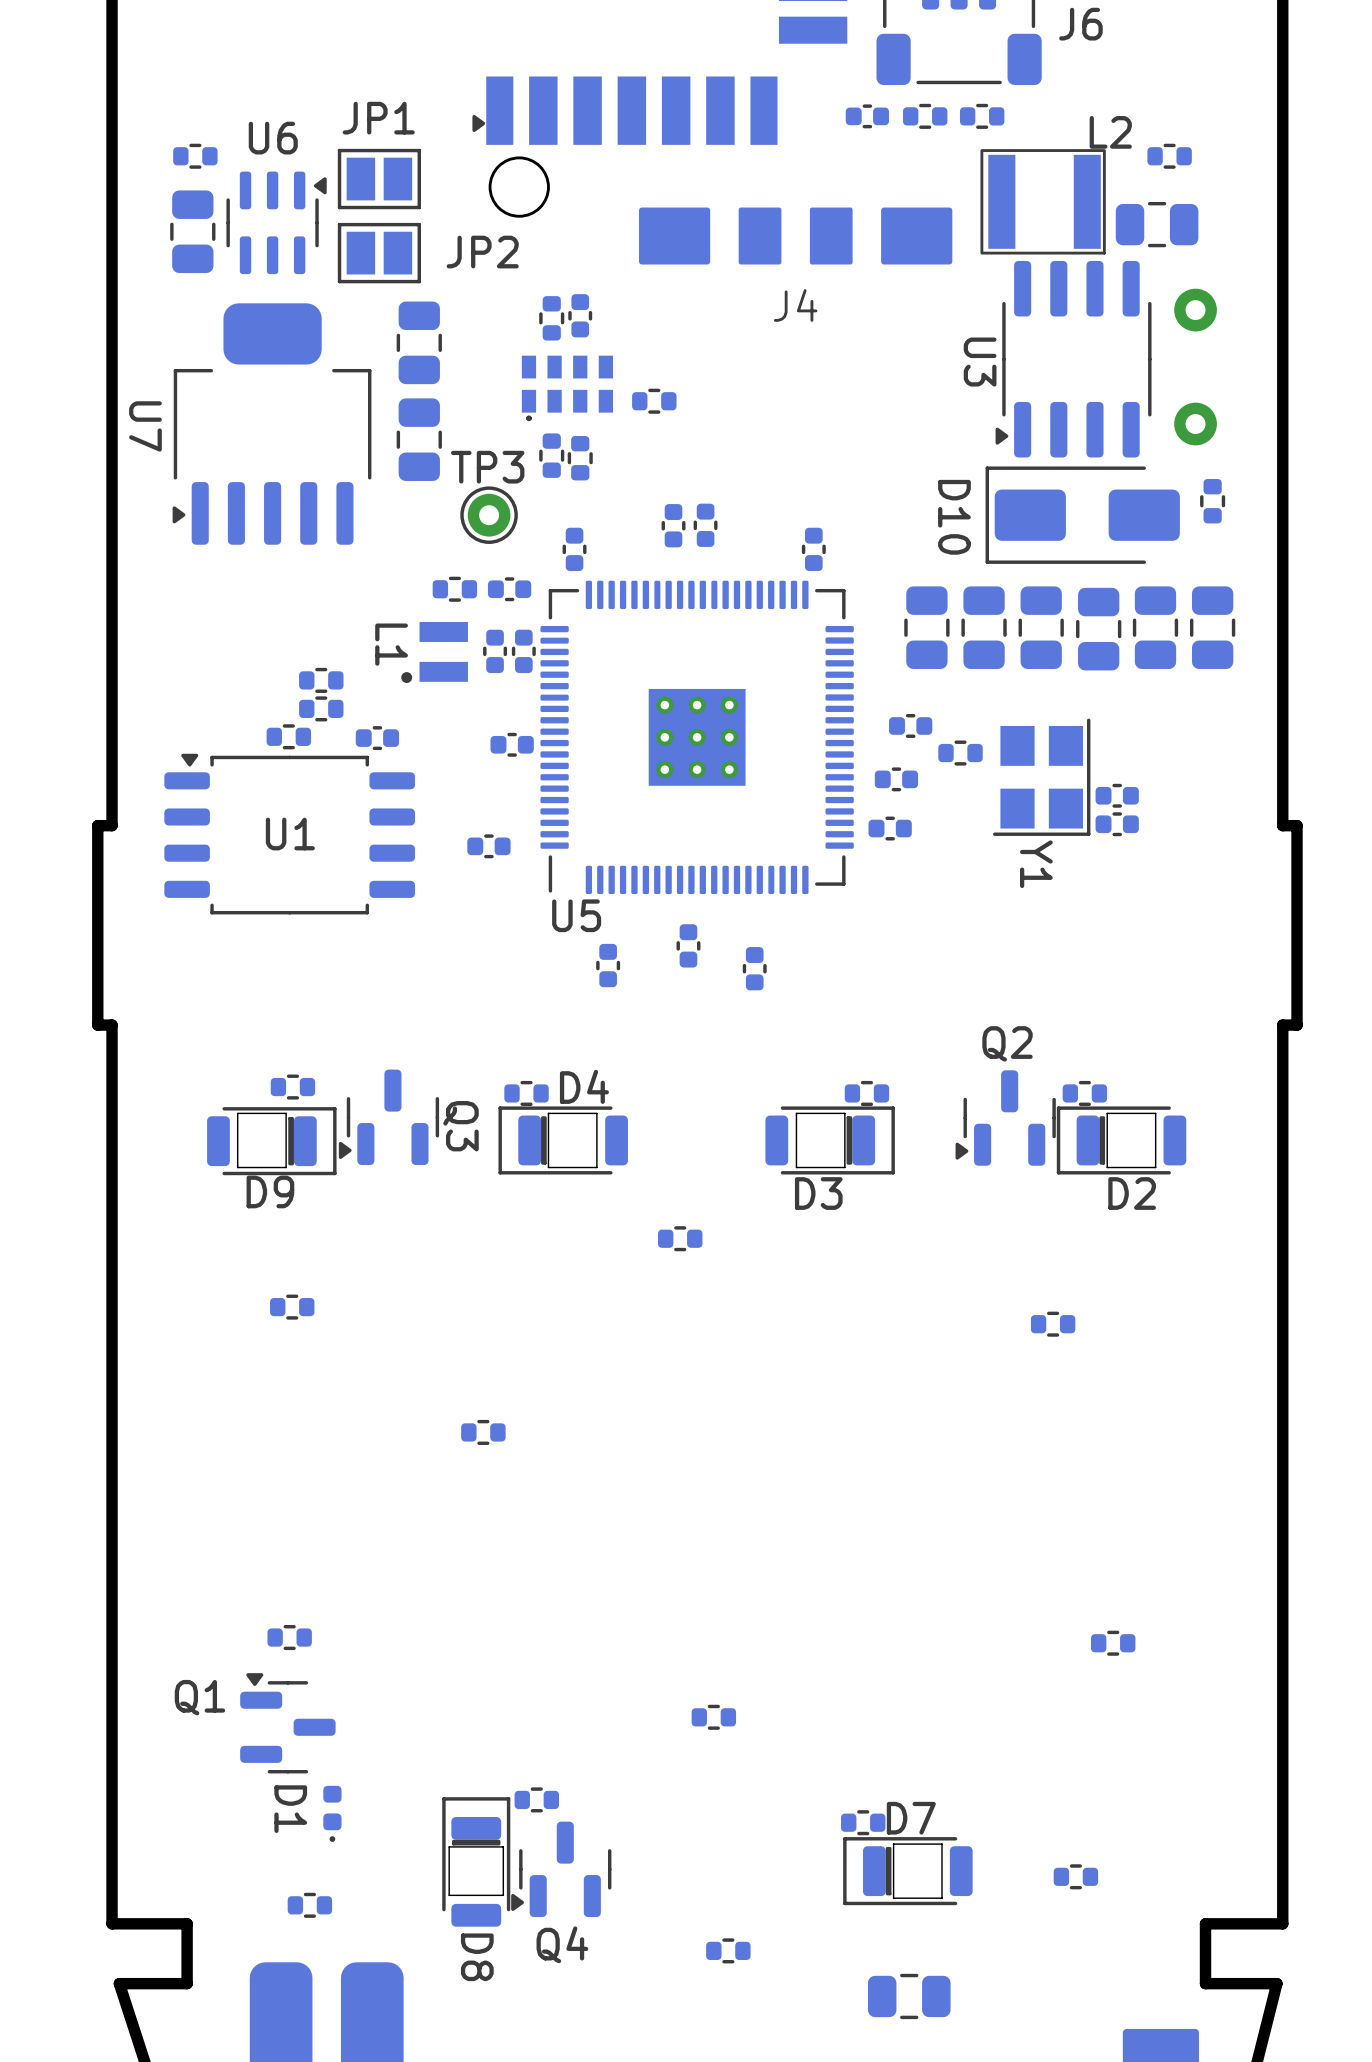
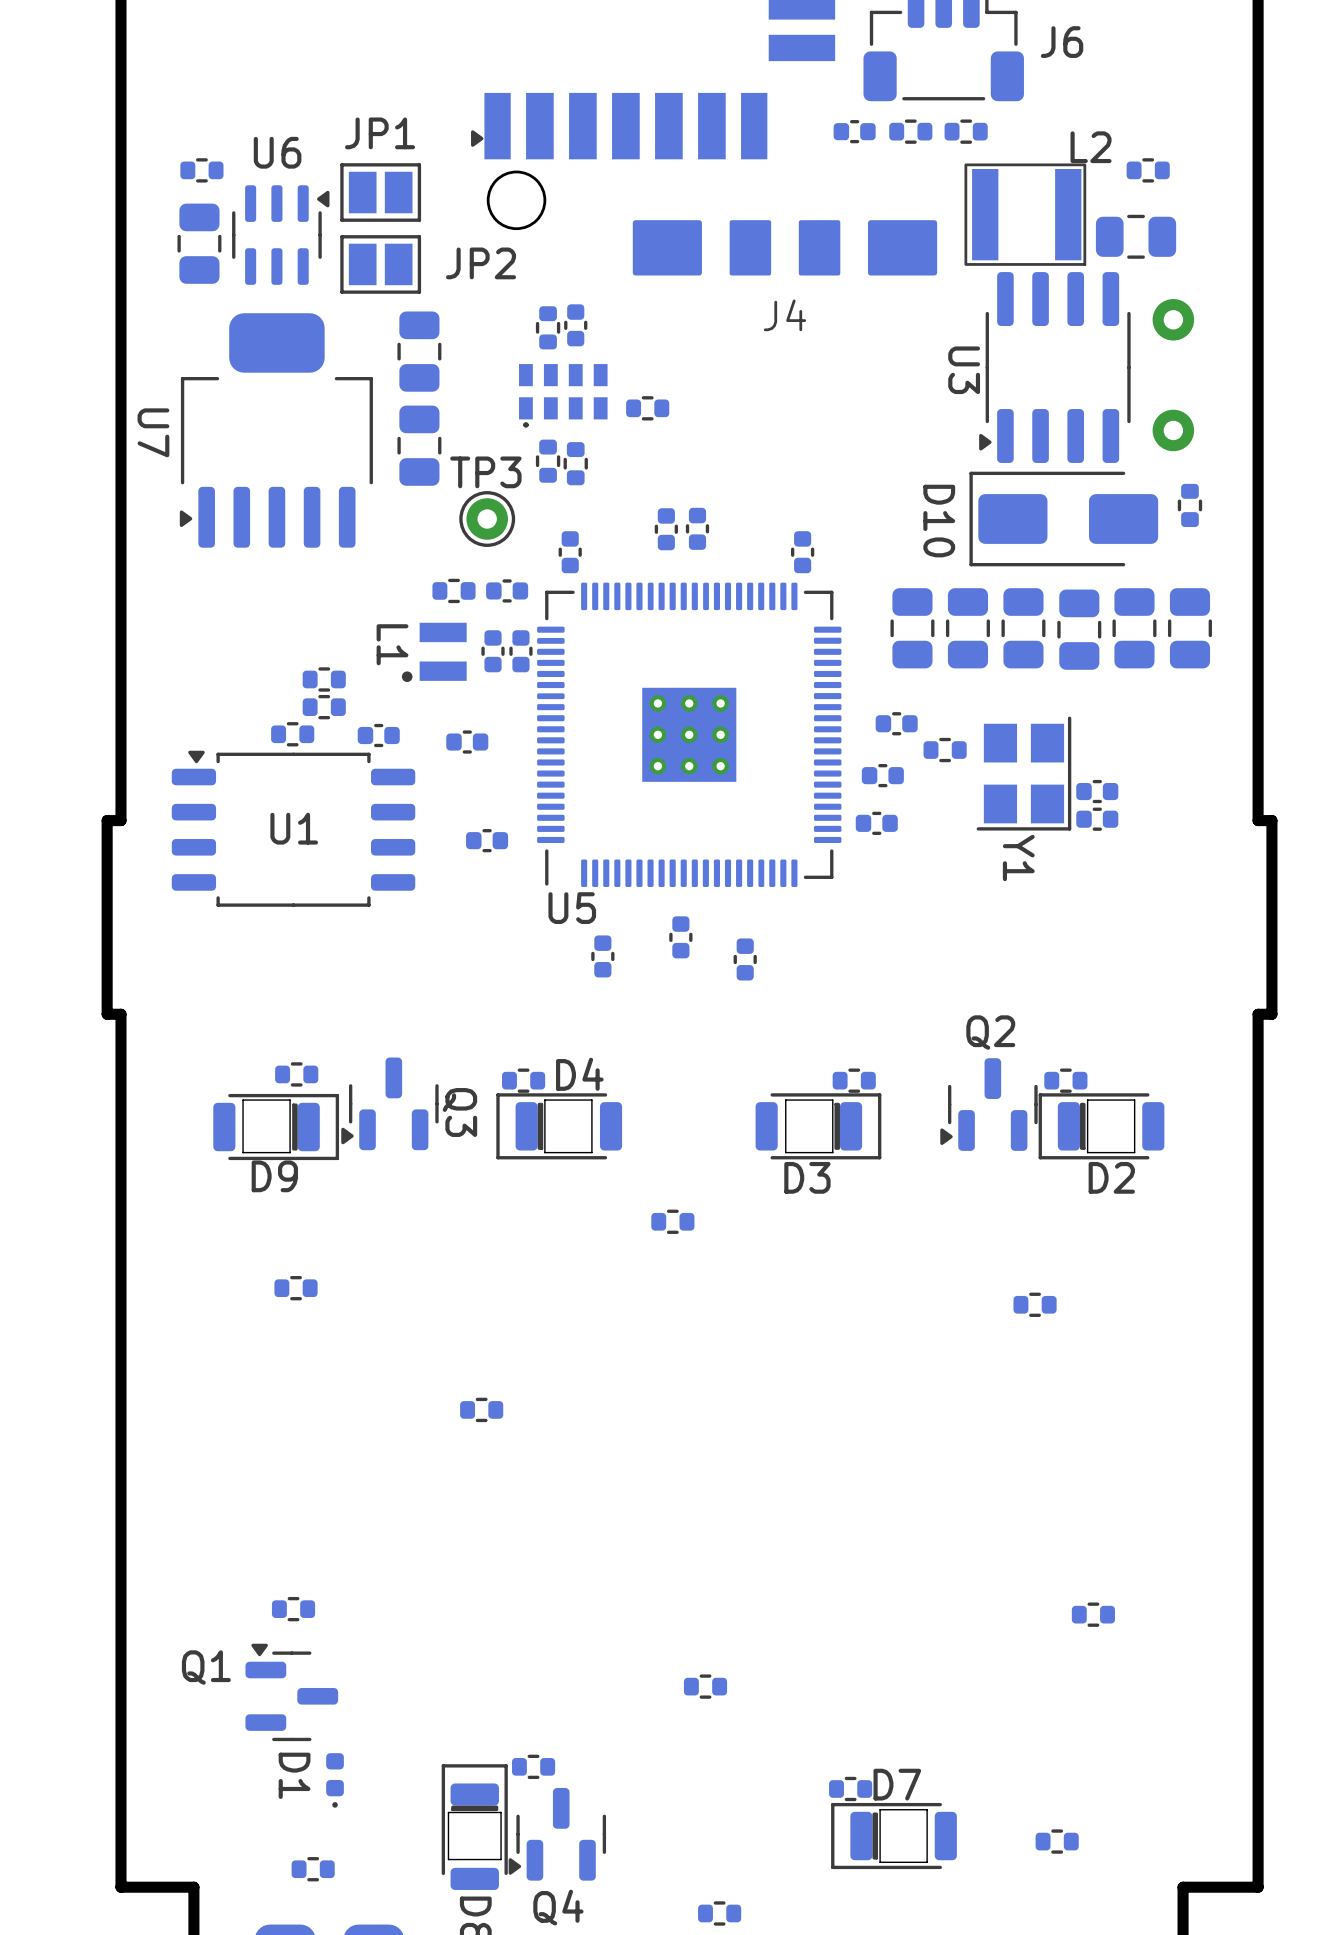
part position: (512, 744) -> (467, 742)

